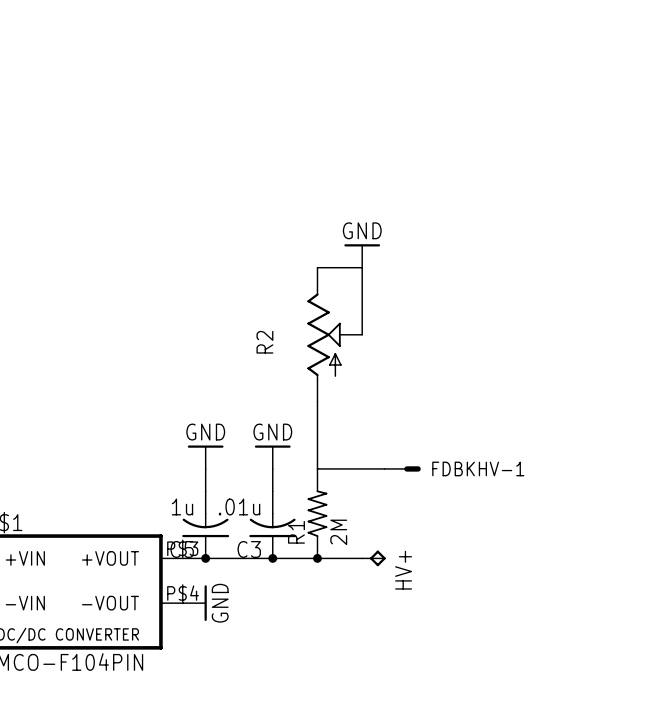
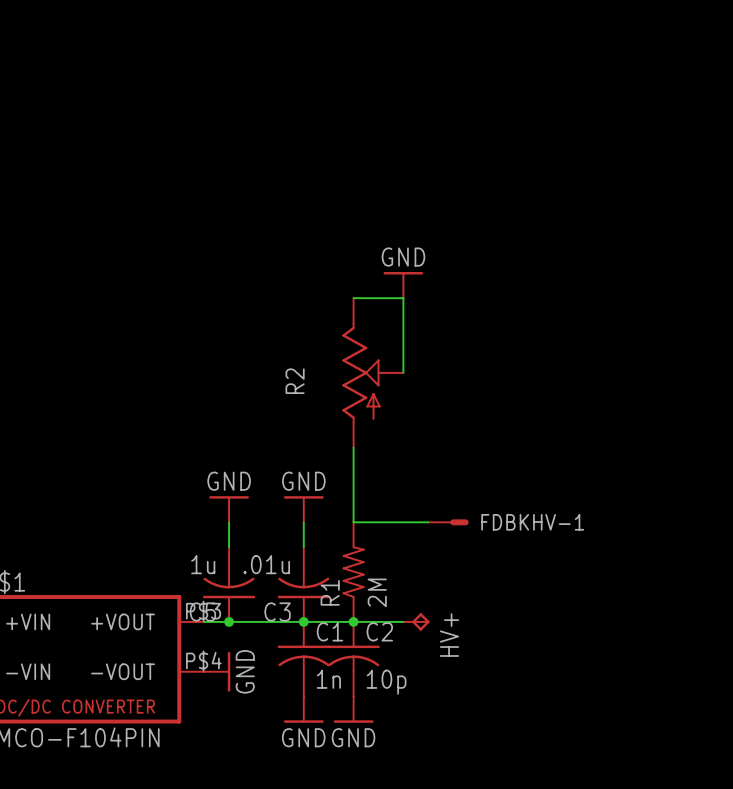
C1: none -> 1n (303, 659)
C2: none -> 10p (353, 659)
power symbol: none -> GND (303, 709)
power symbol: none -> GND (353, 709)

